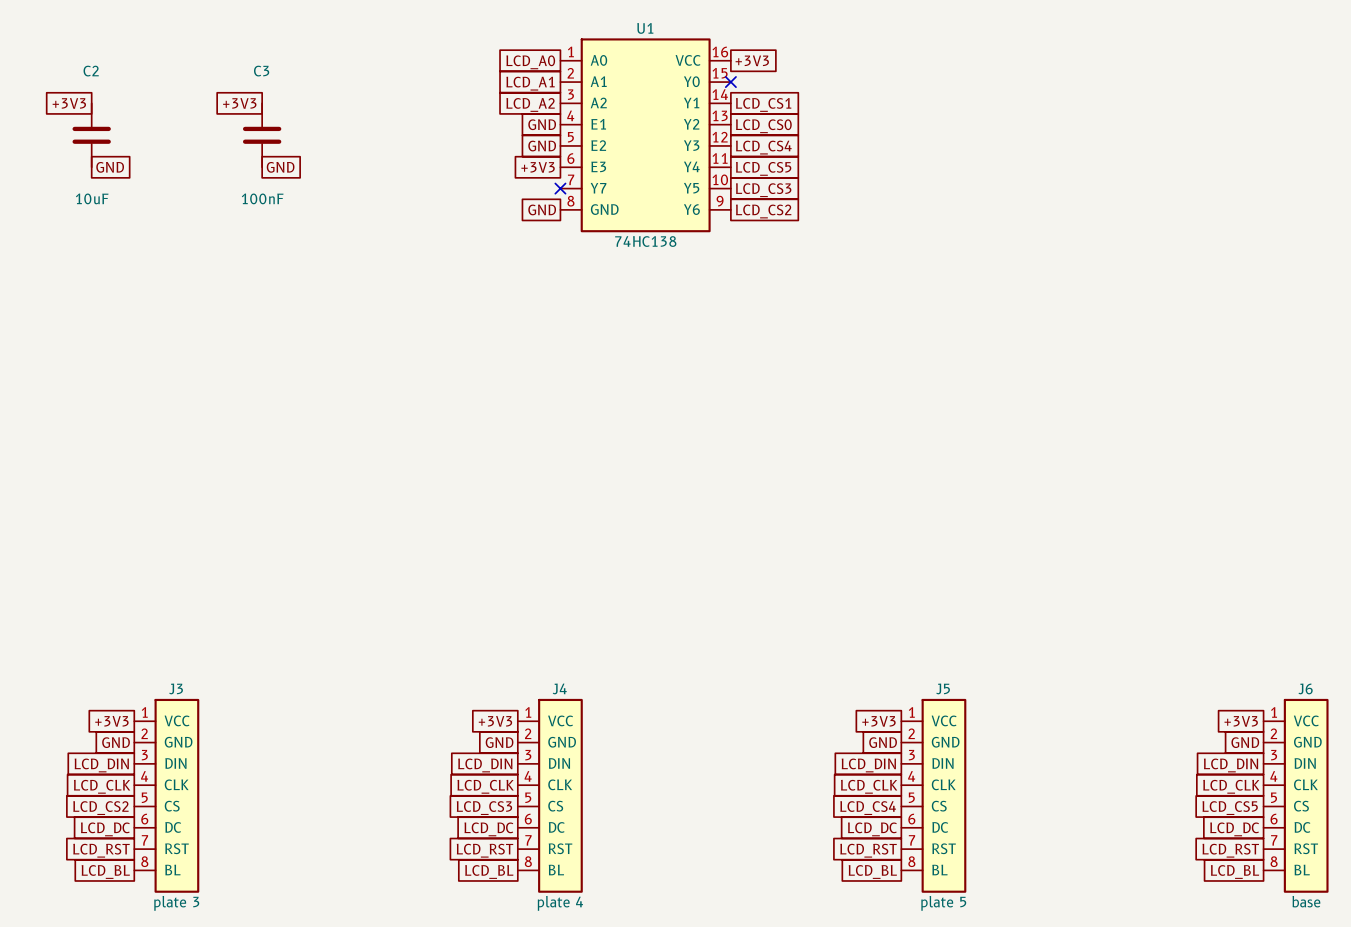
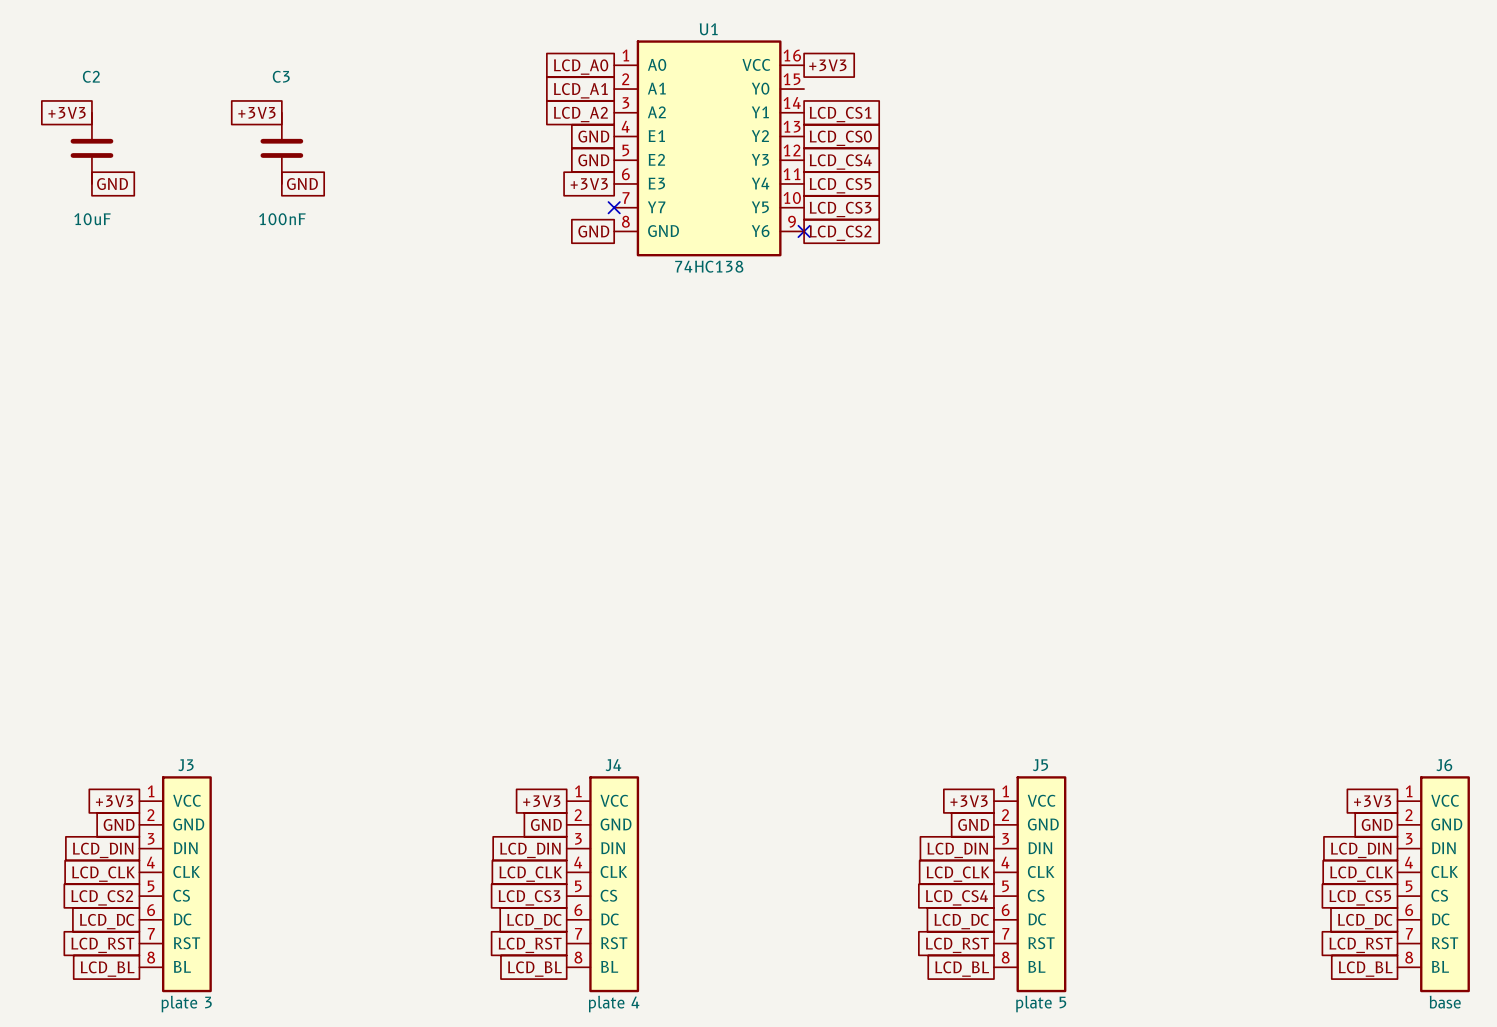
no-connect mark: (730, 82) -> none
no-connect mark: none -> (804, 231)

